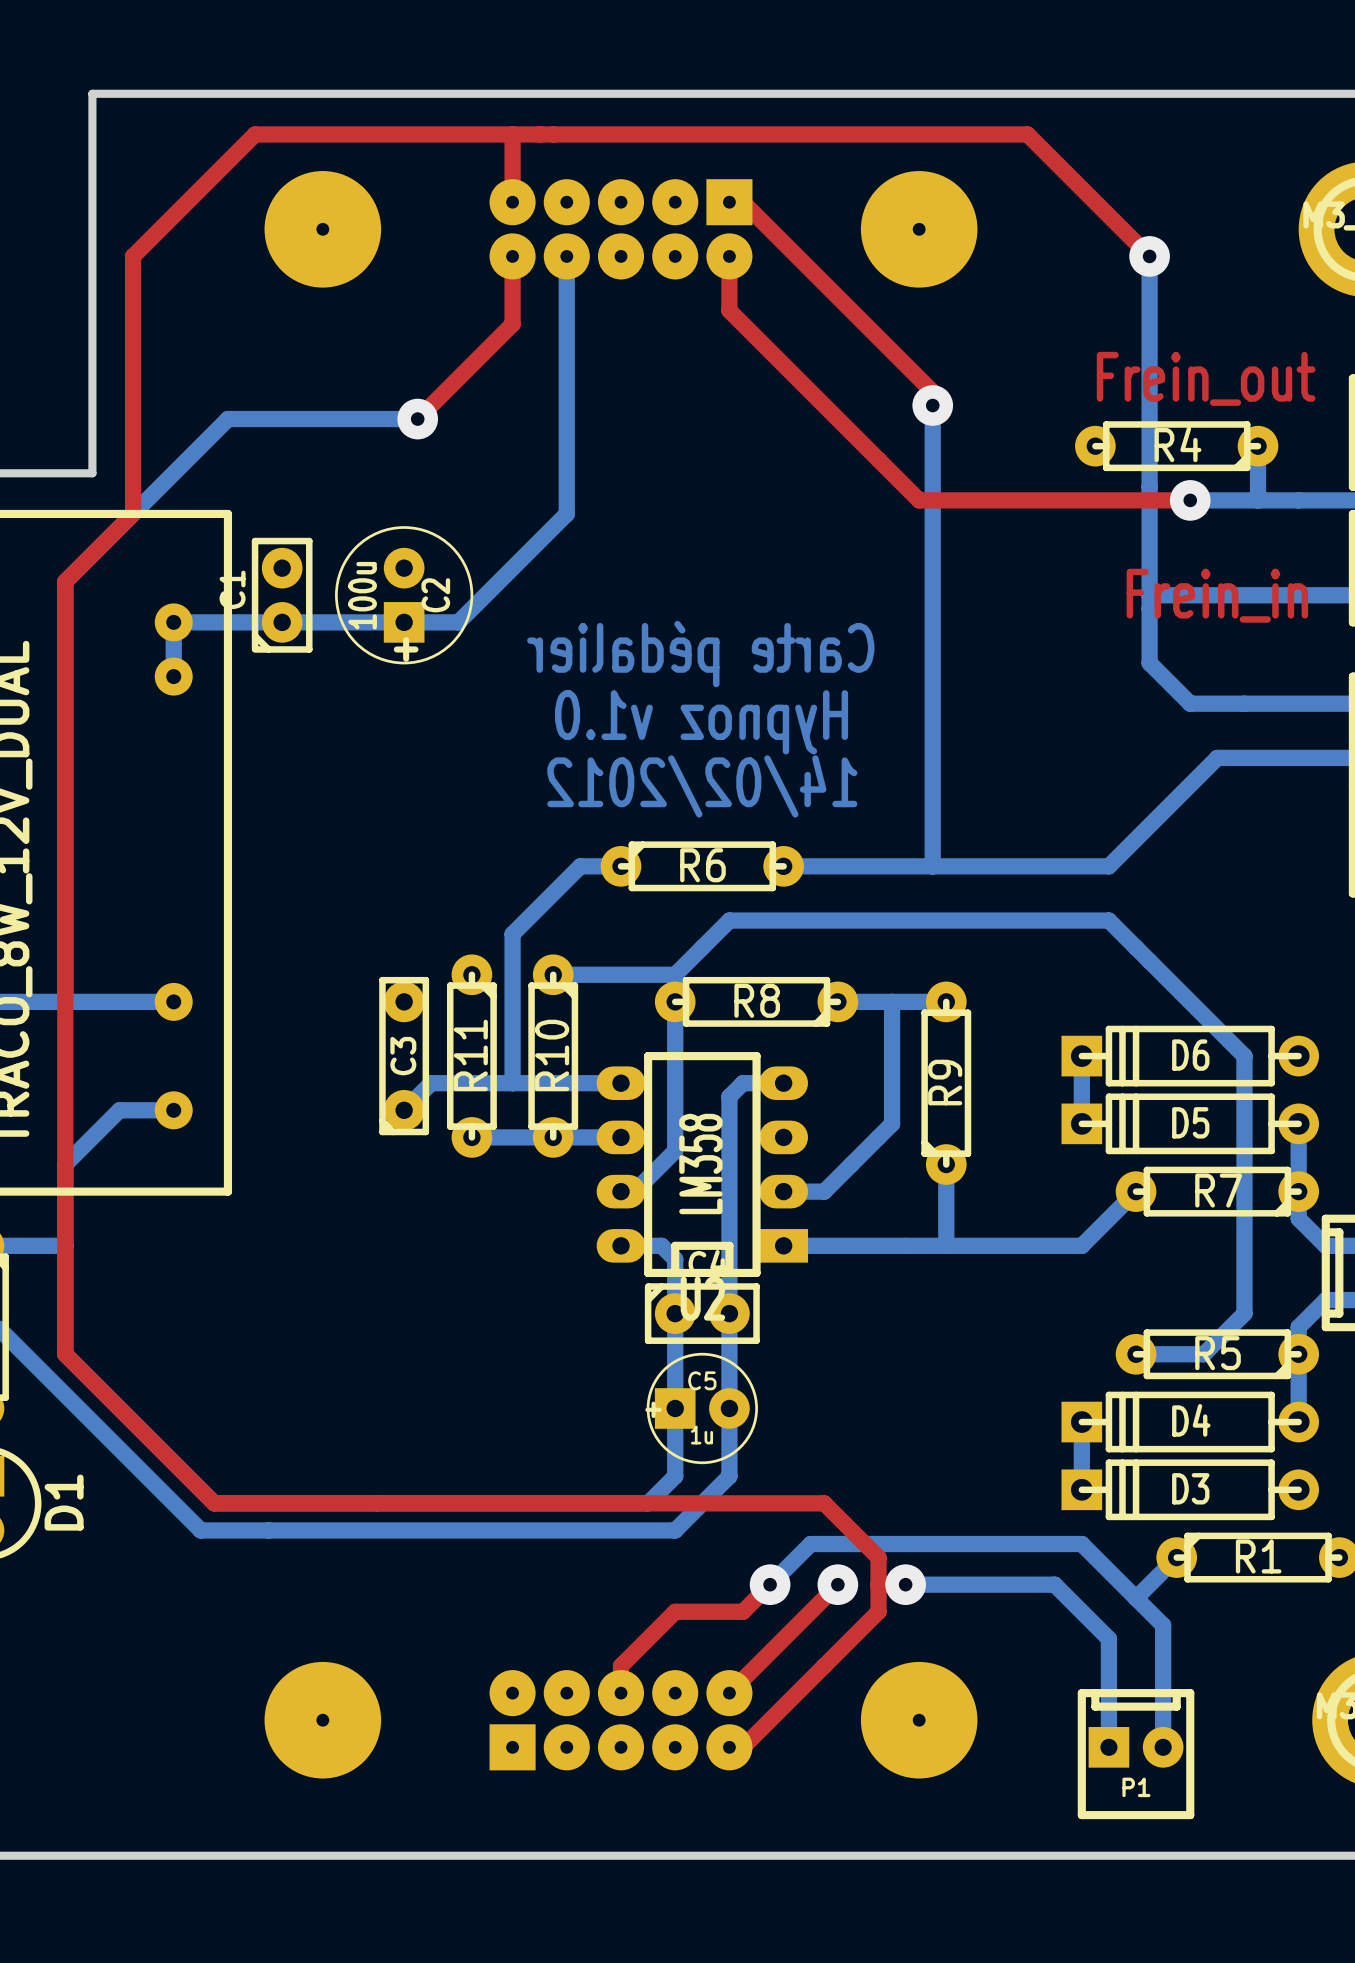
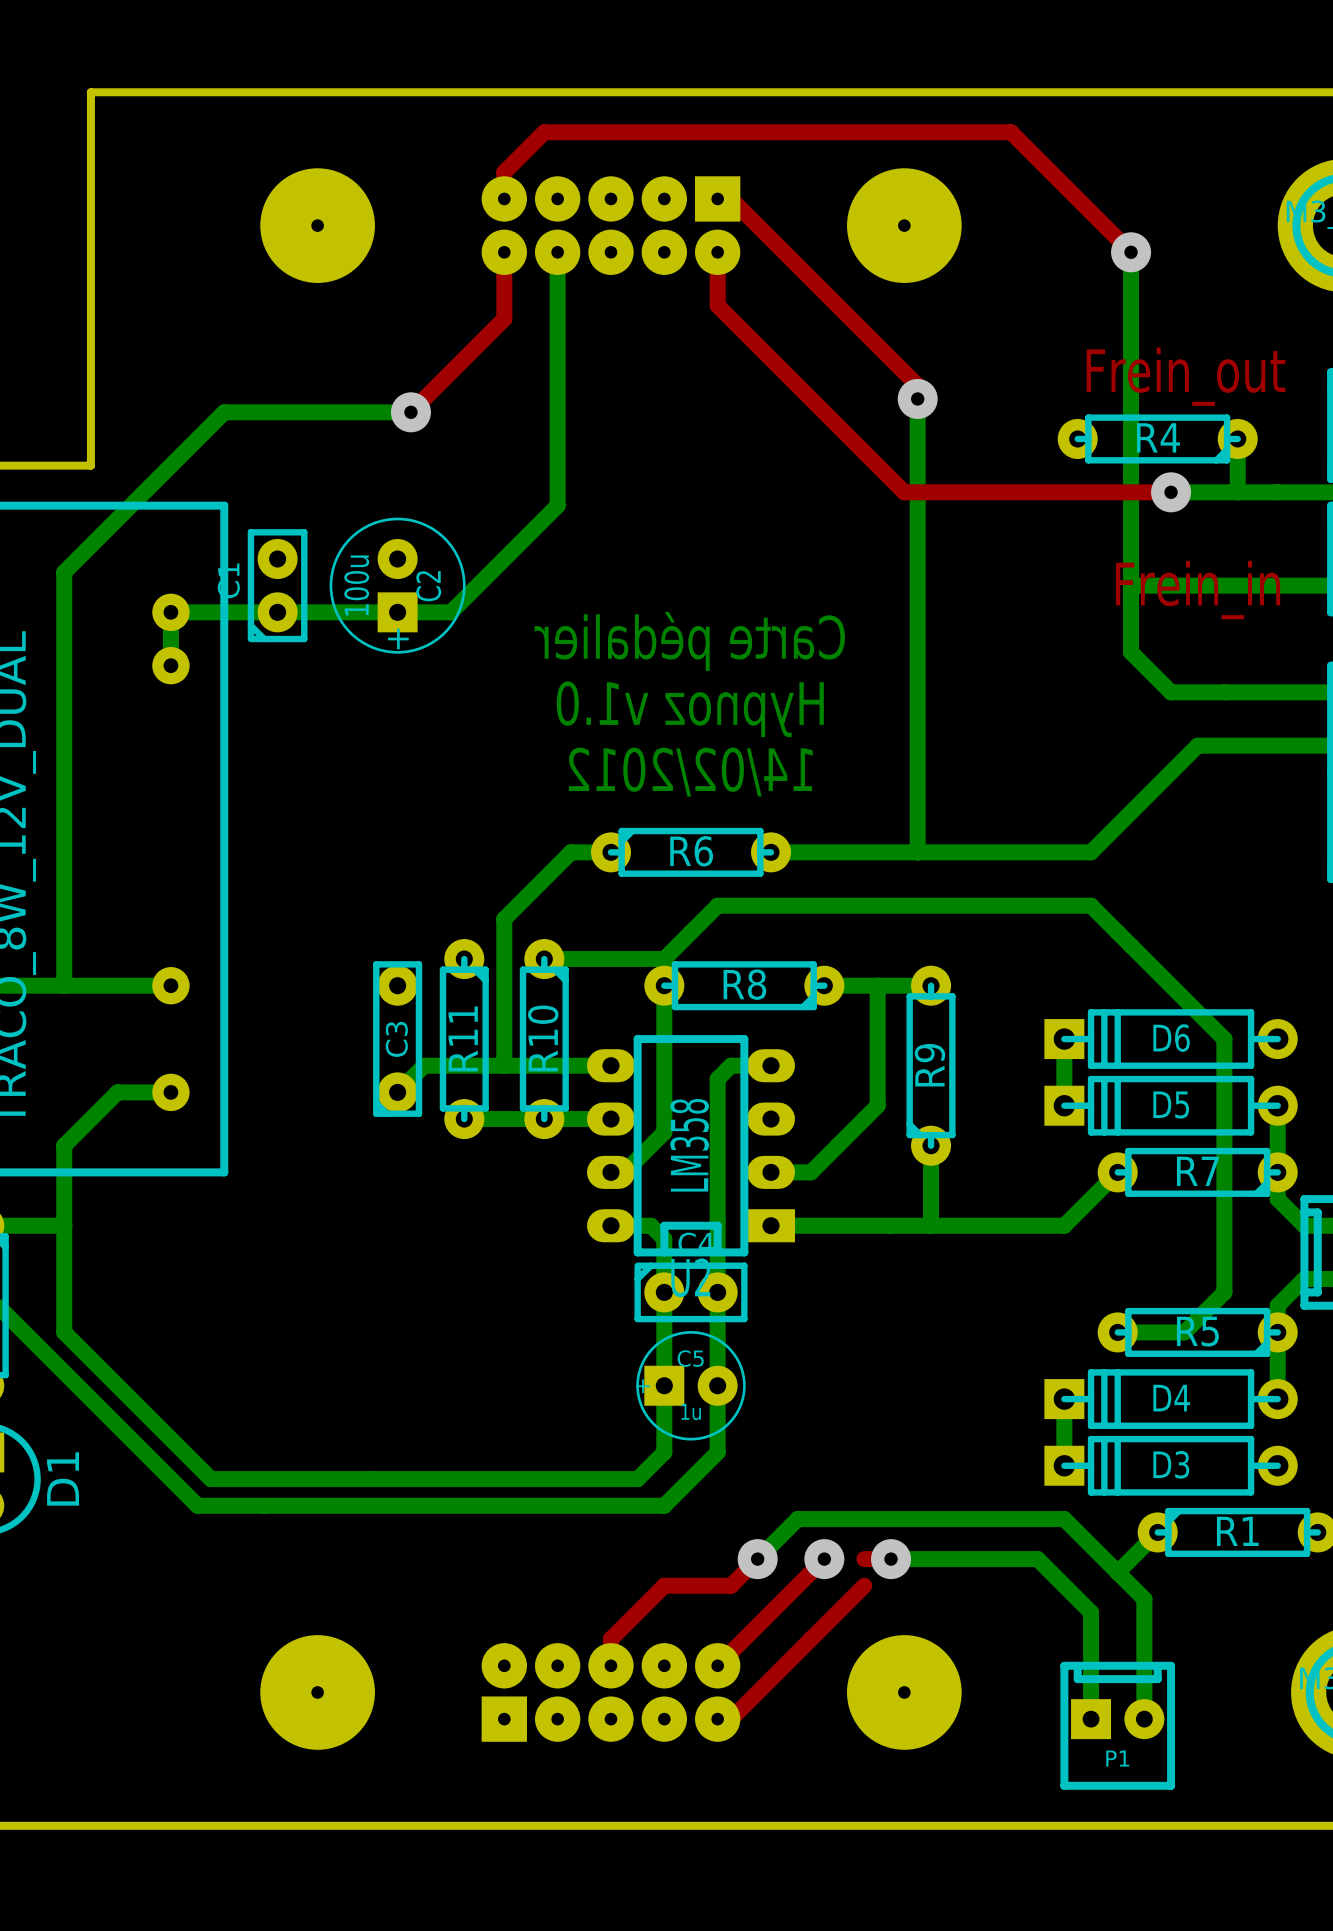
top track: (512, 134) (512, 175) -> (544, 132) (504, 172)
top track: (553, 134) (255, 134) (133, 256) (133, 513) (65, 581) (65, 1354) (214, 1503) (824, 1503) (878, 1557) (878, 1611) -> none

